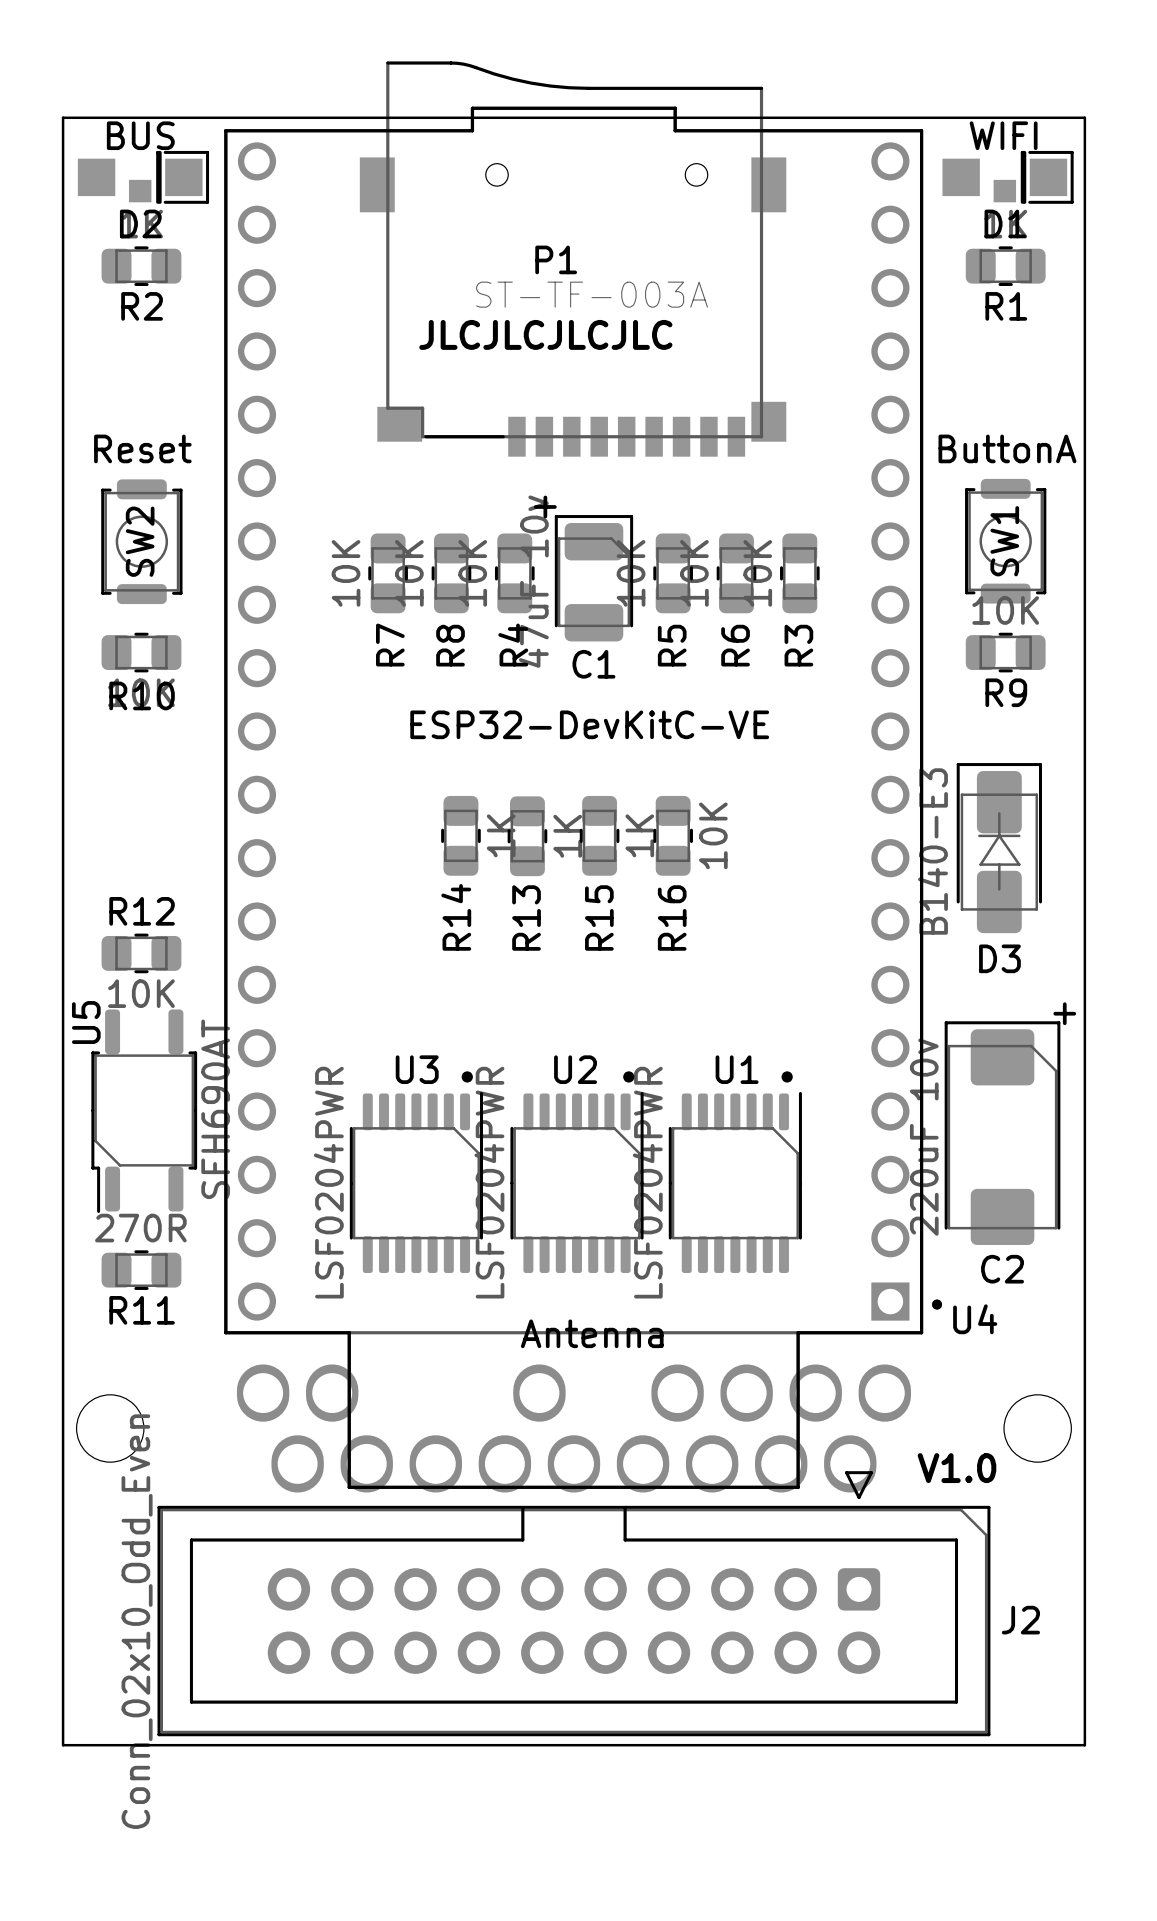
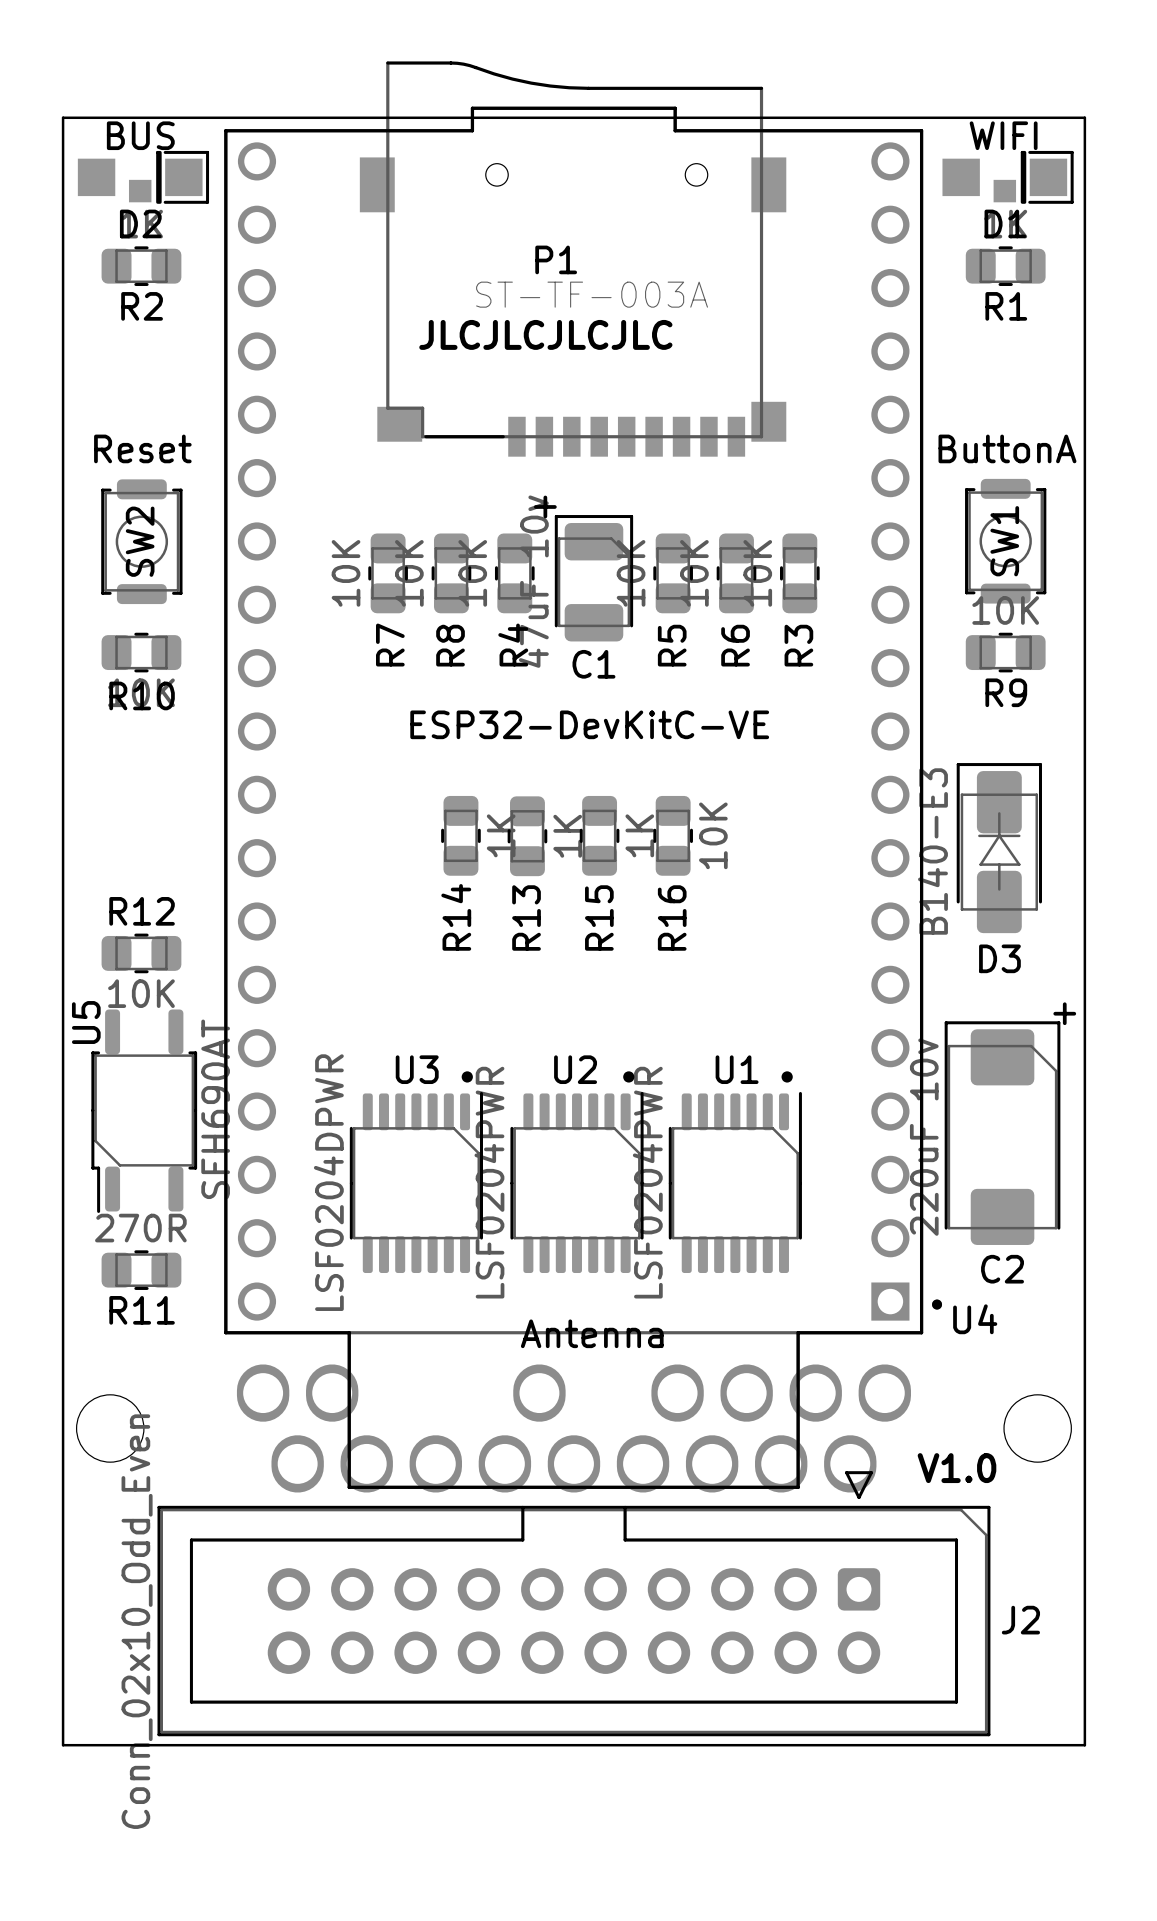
U3 value: LSF0204PWR (328, 1182) -> LSF0204DPWR (328, 1182)

